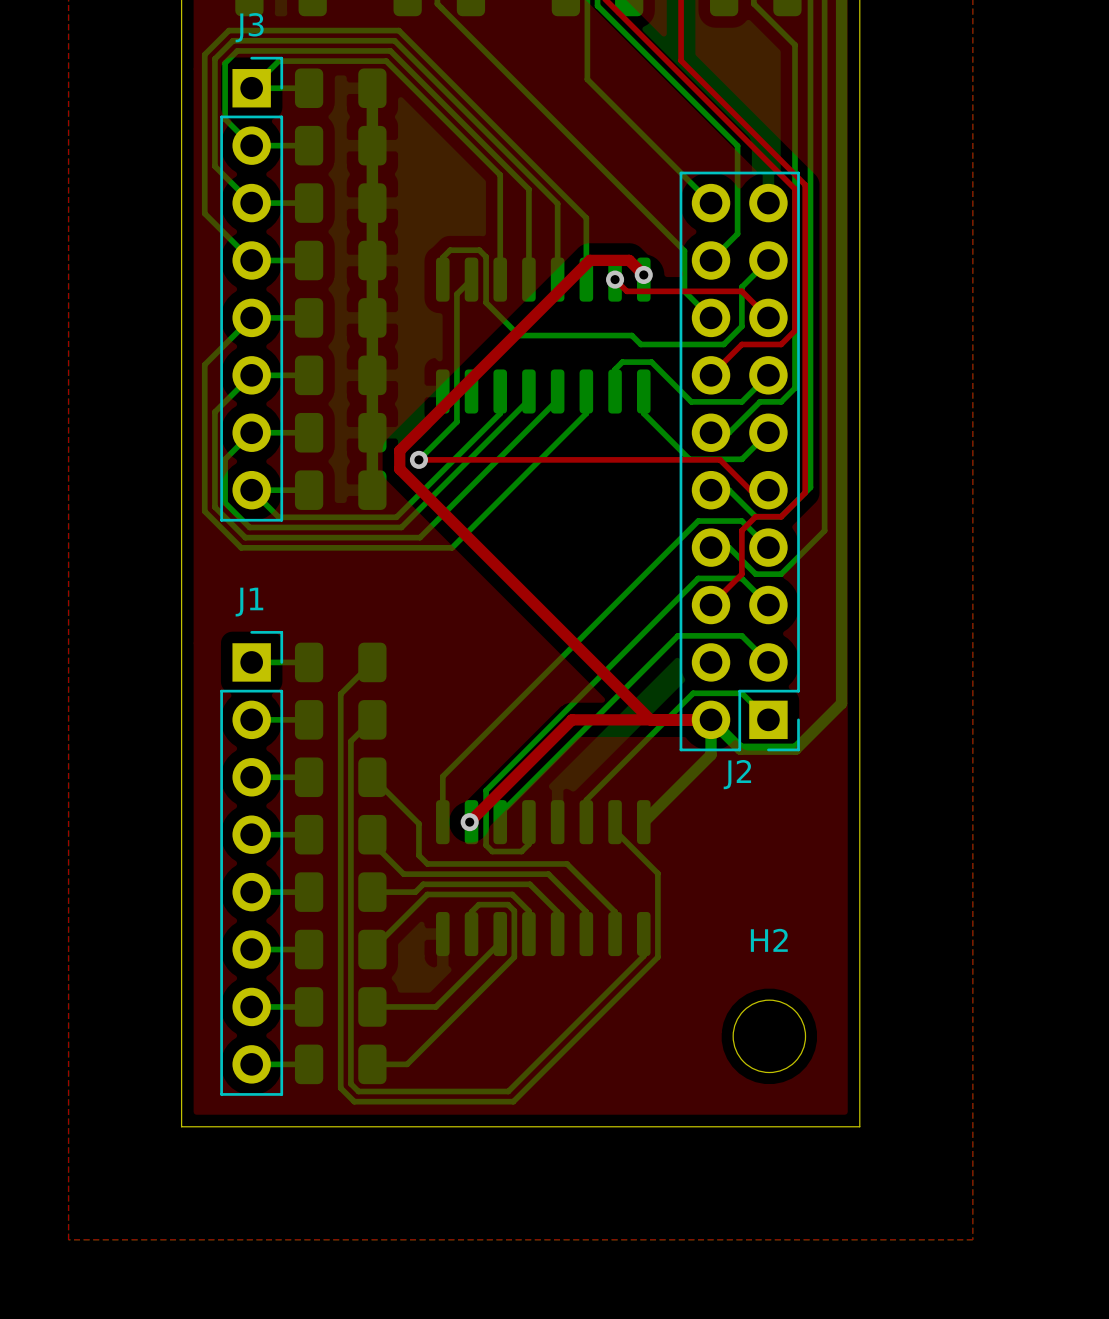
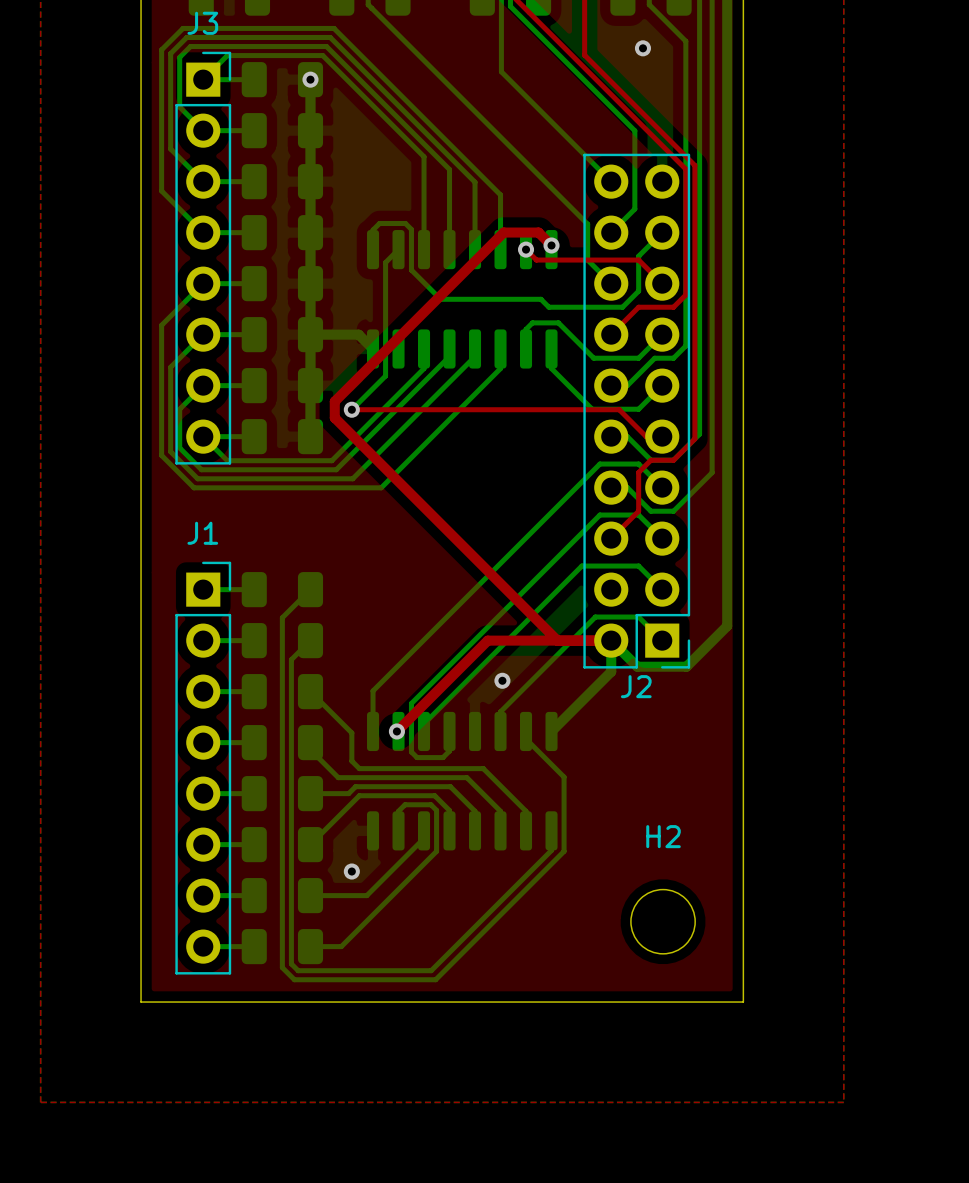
via: none -> (642, 48)
via: none -> (310, 79)
bottom track: none -> (310, 334) (358, 334) (373, 348)
via: none -> (502, 680)
via: none -> (351, 871)

